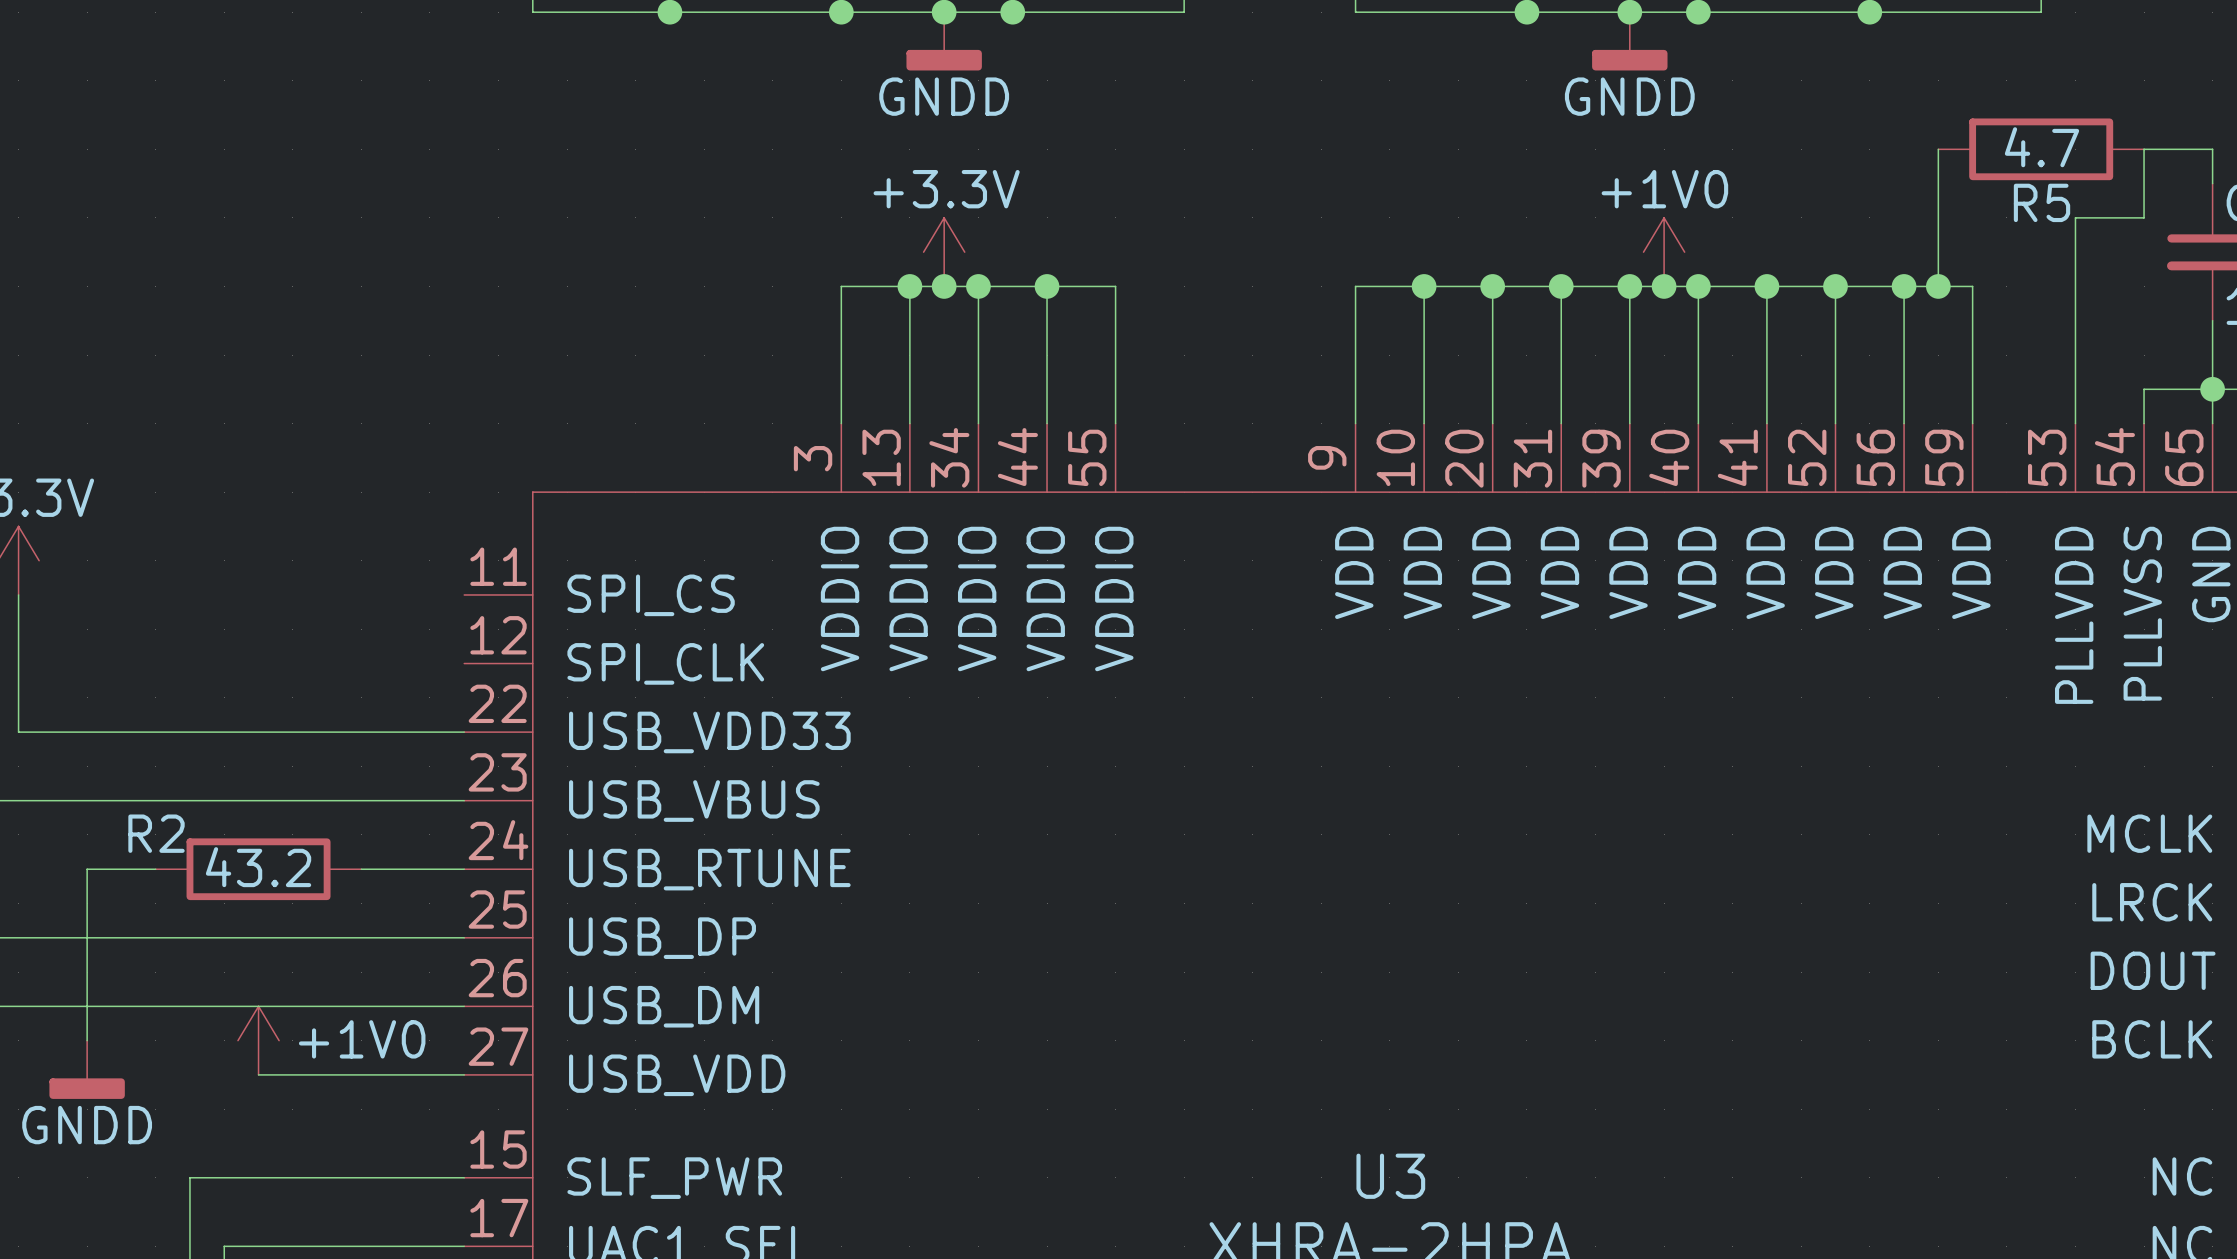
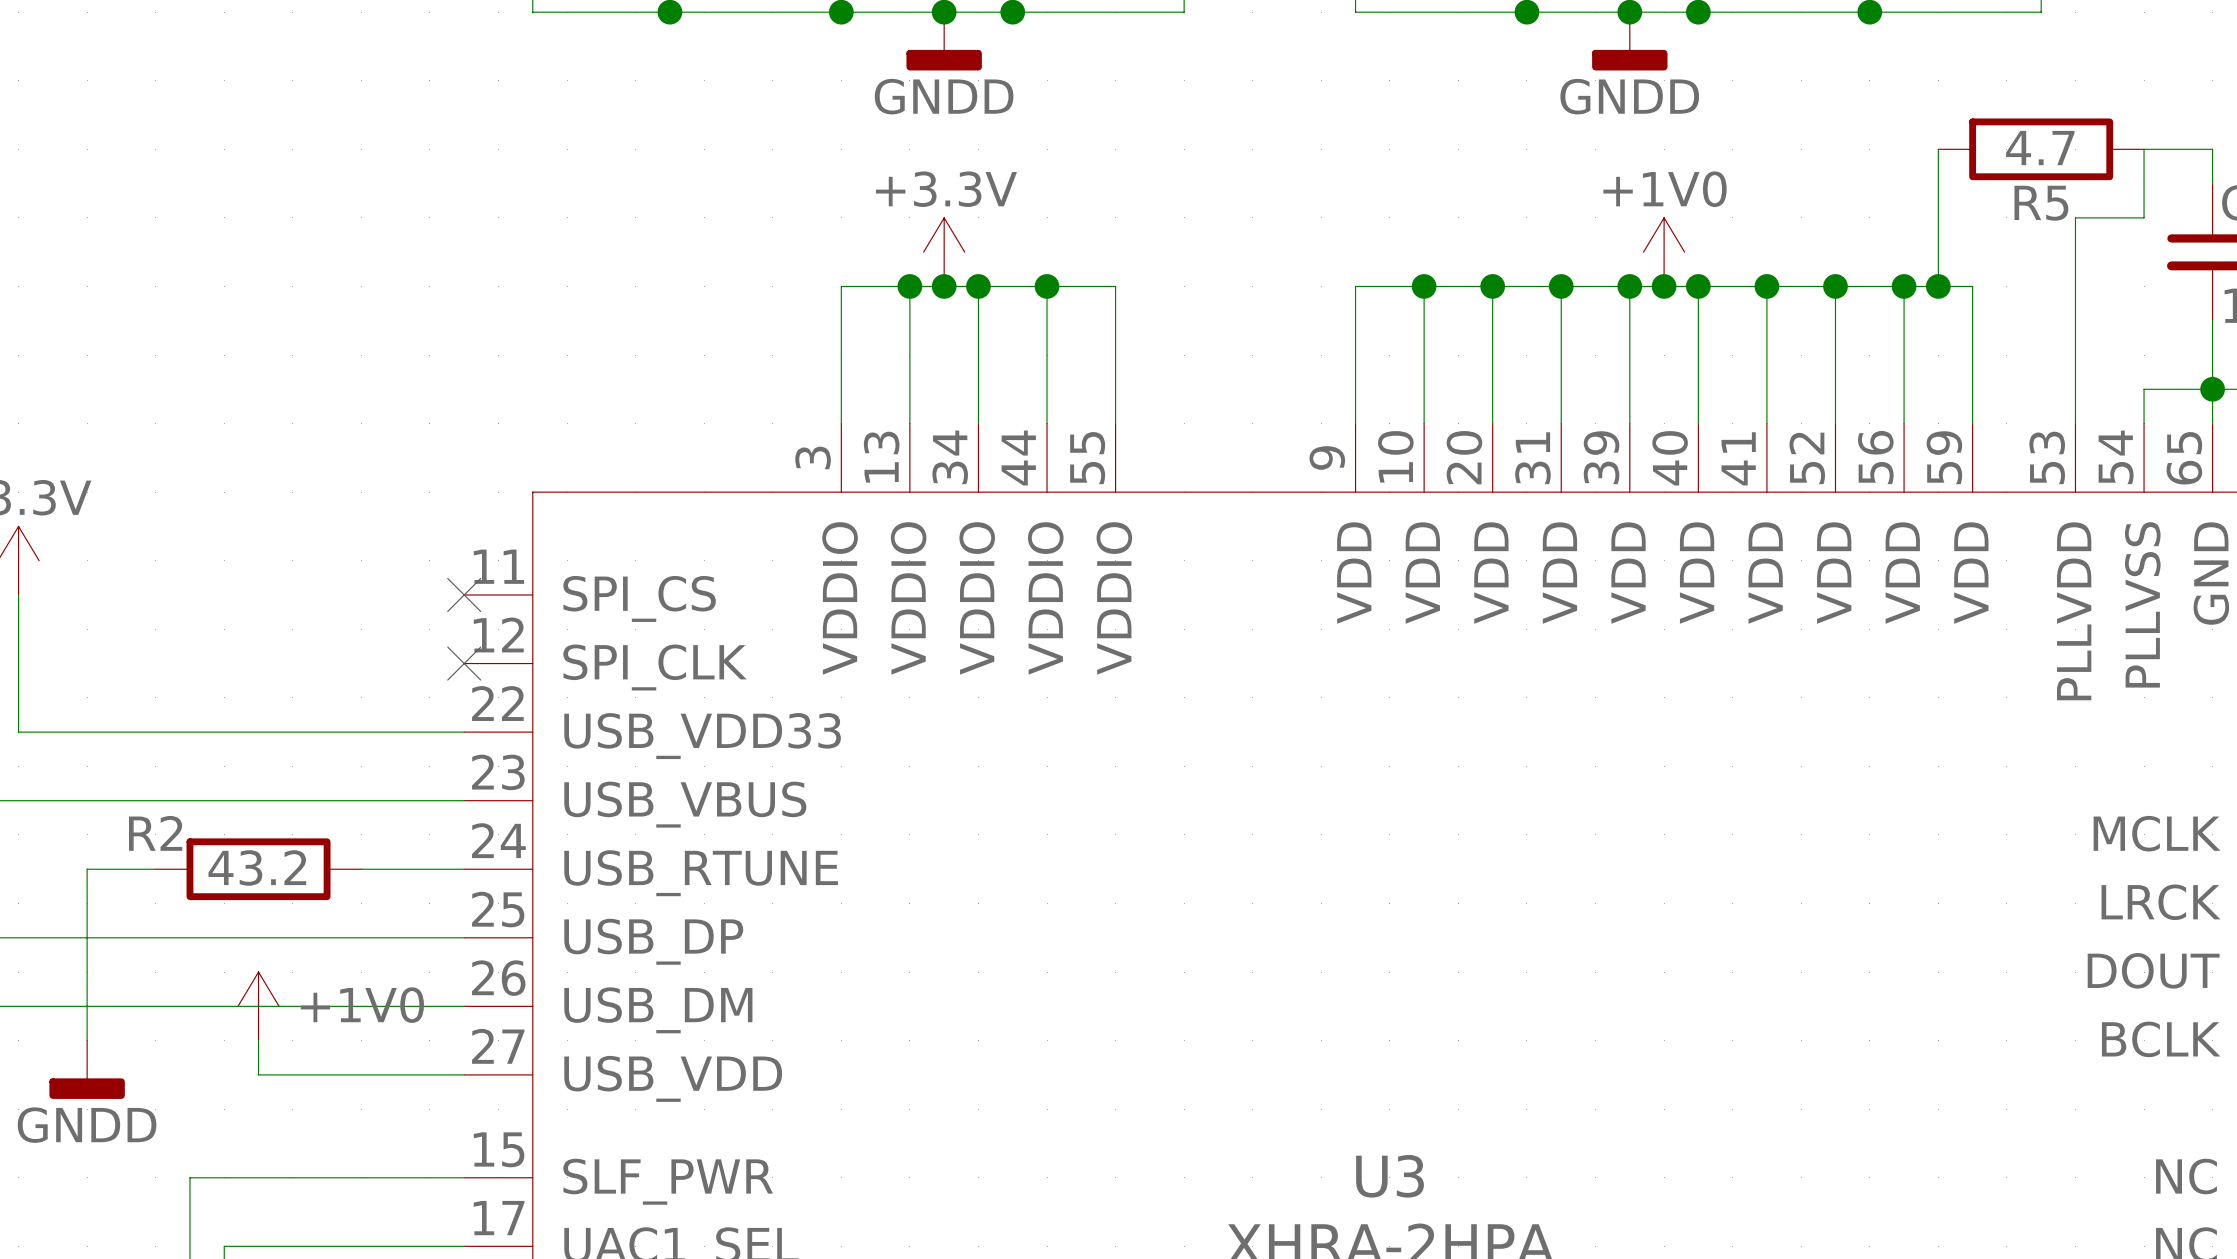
no-connect mark: none -> (464, 594)
no-connect mark: none -> (464, 663)
power symbol position: +1V0 (258, 1040) -> +1V0 (258, 1006)

